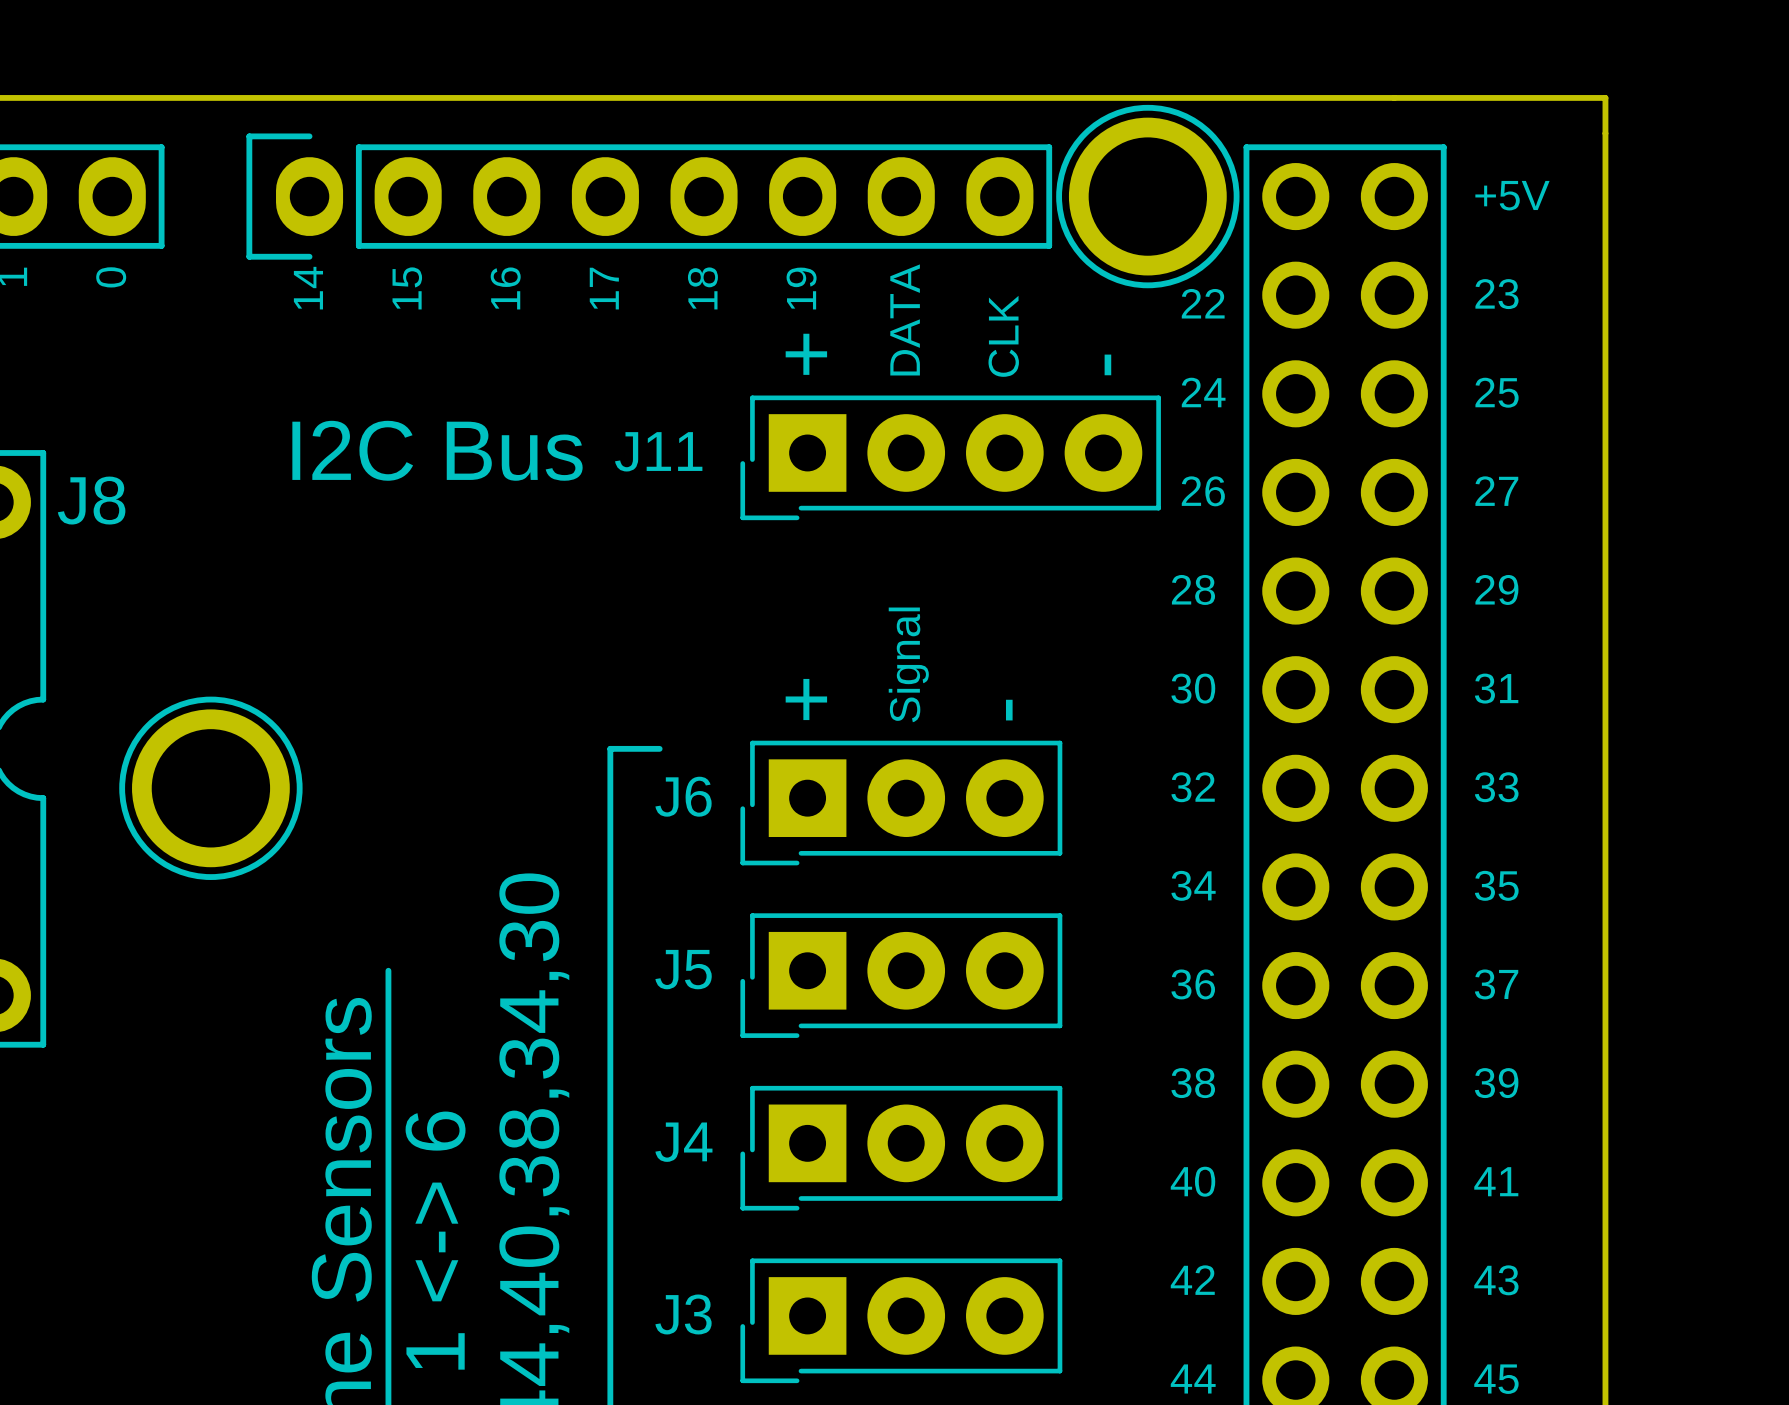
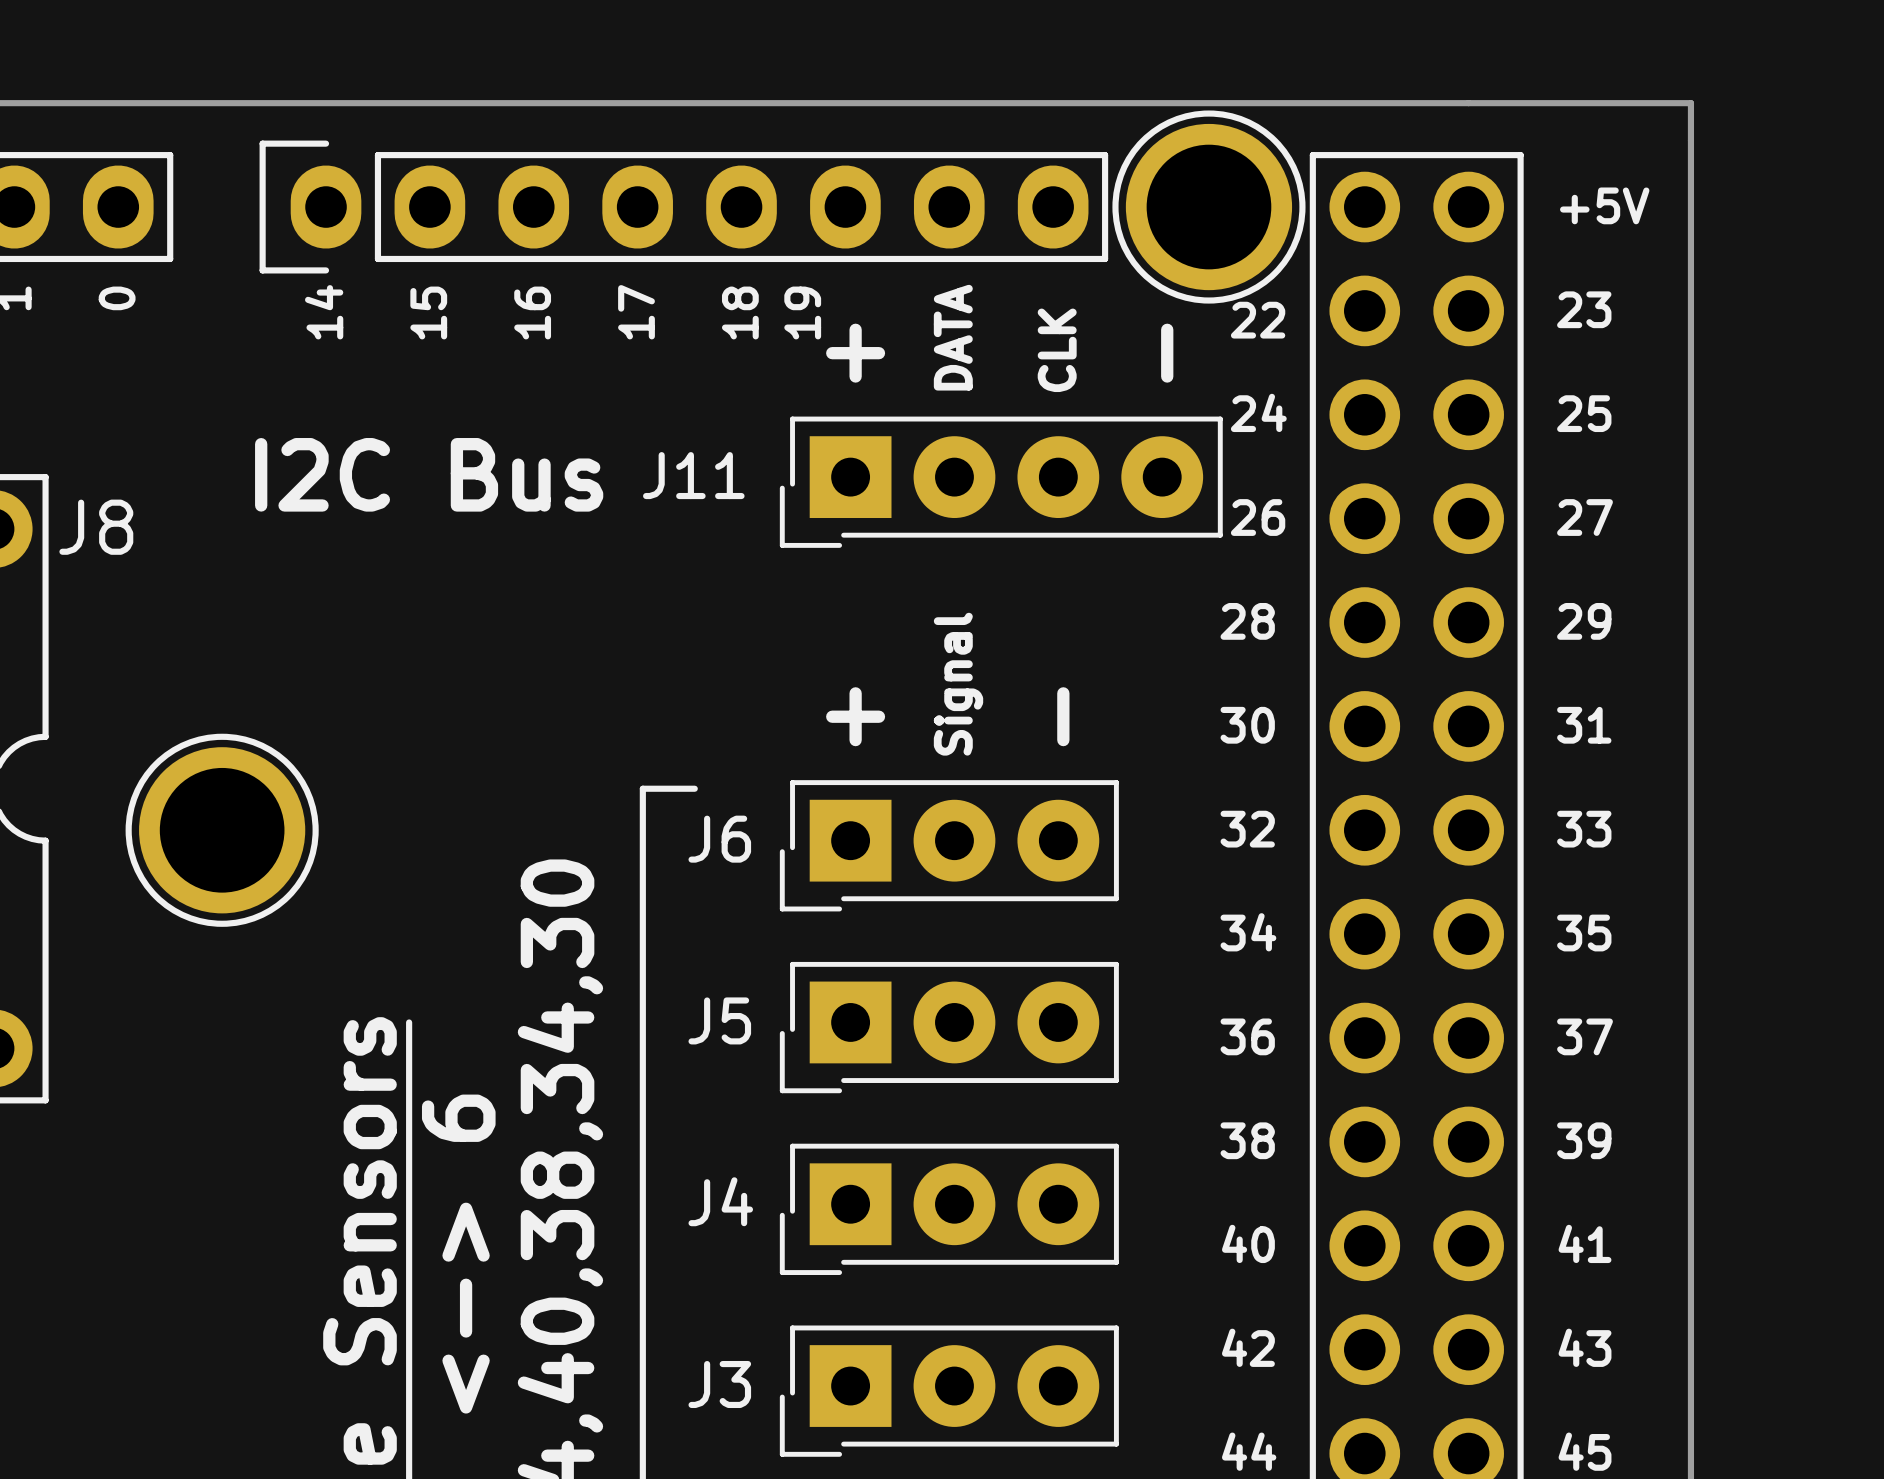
text position: 19 (801, 288) -> 19 (802, 312)

